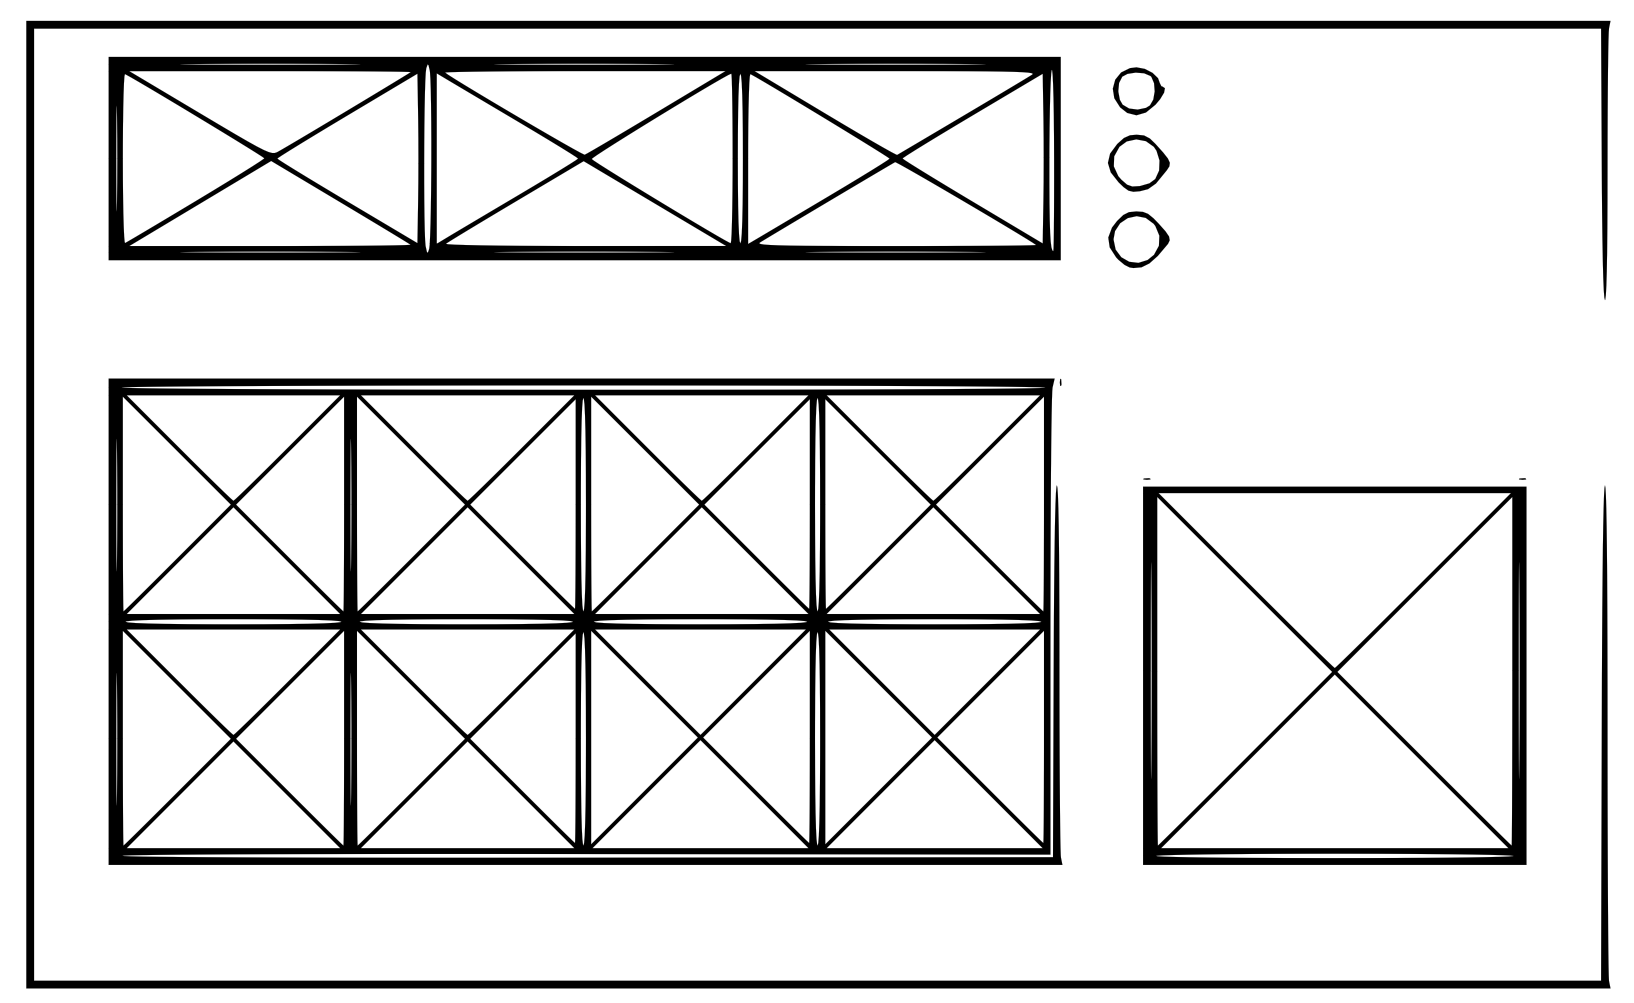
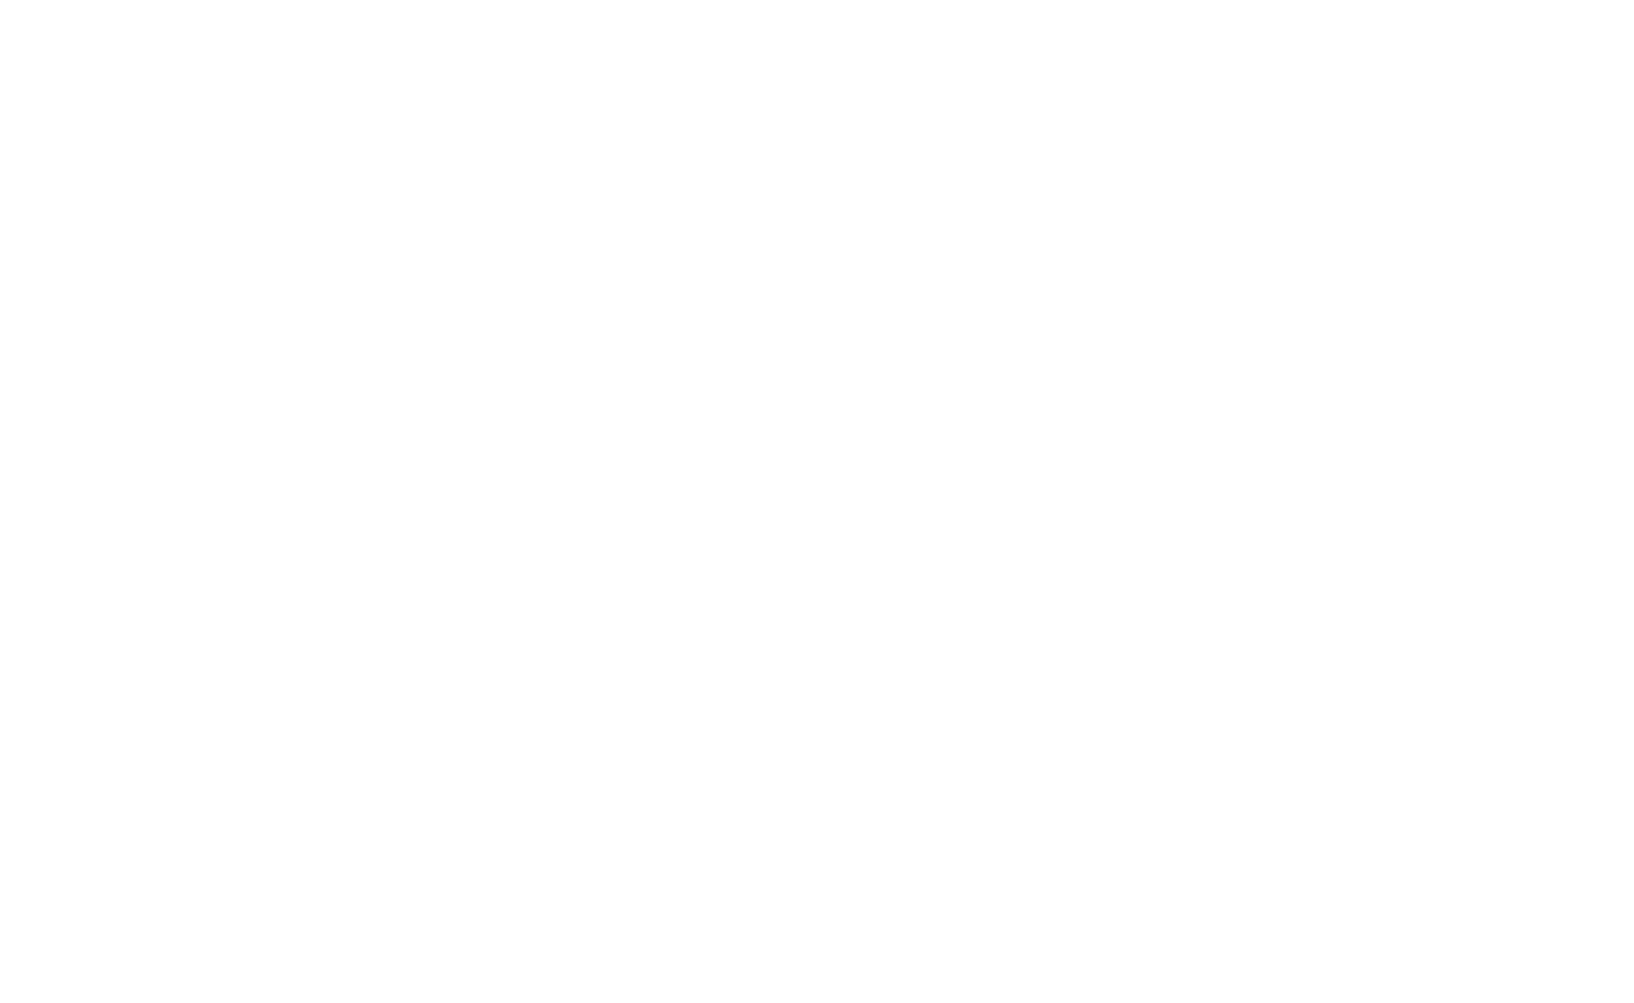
drawing: [26, 20, 1611, 989] -> none

